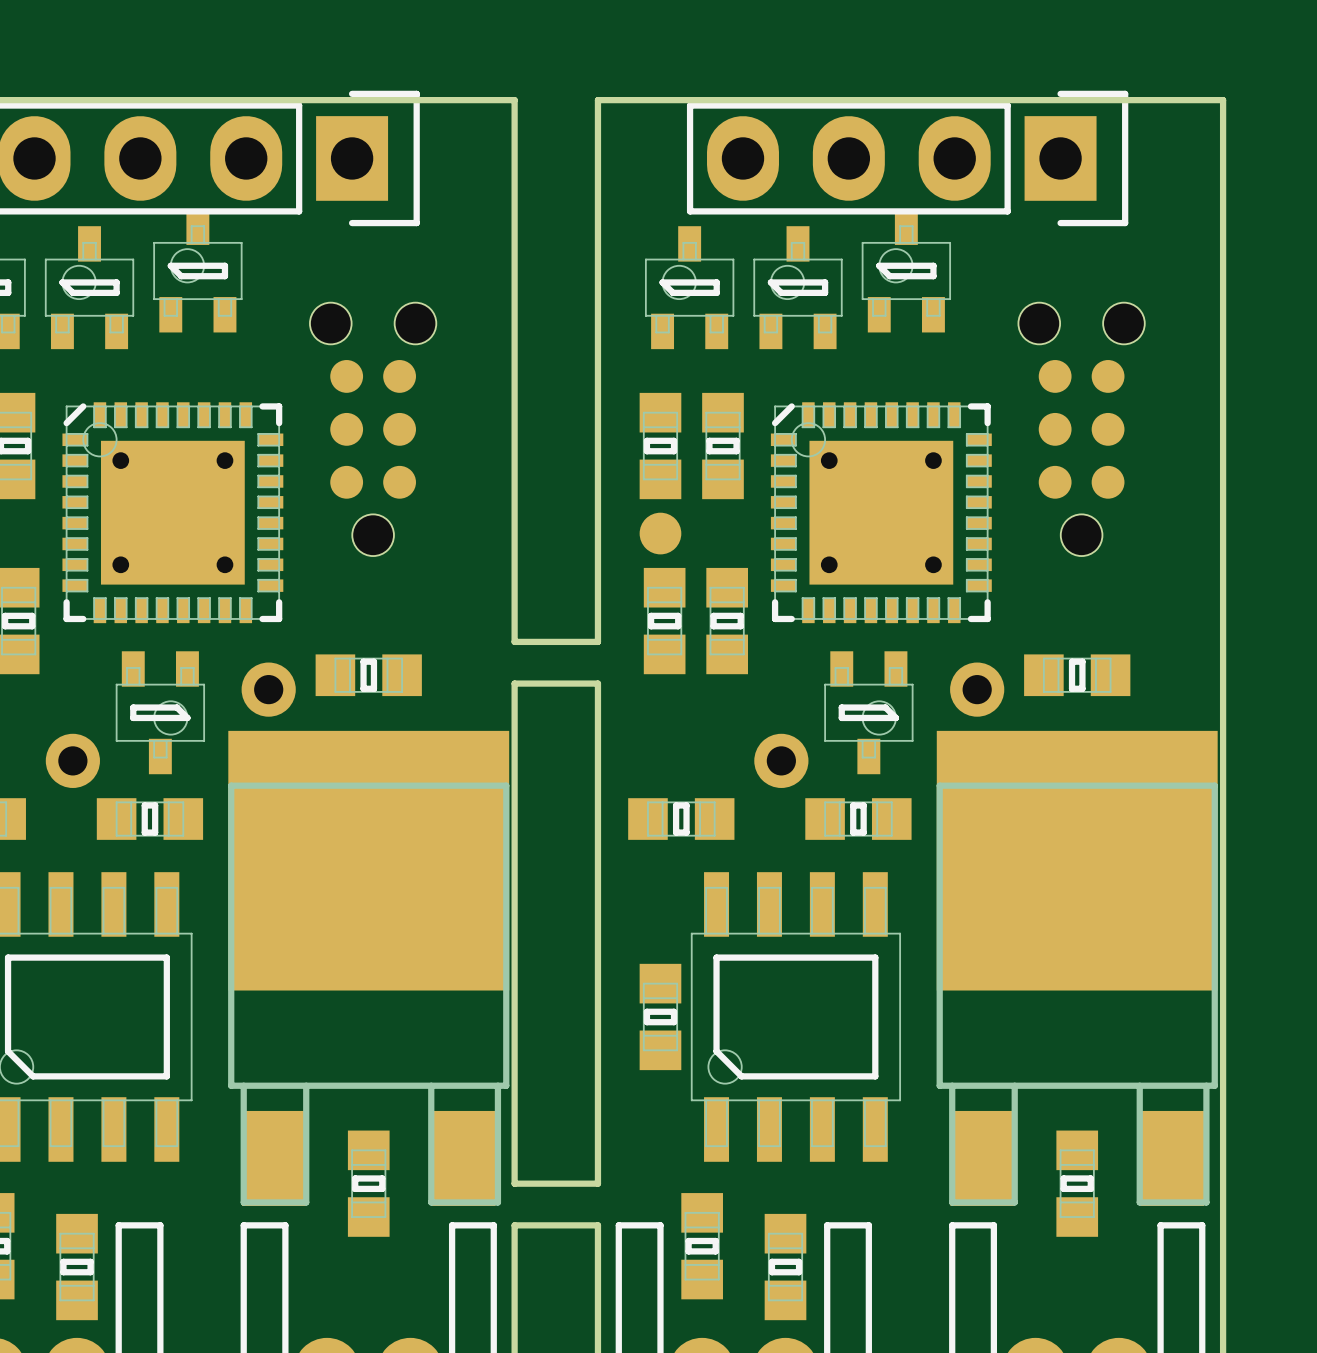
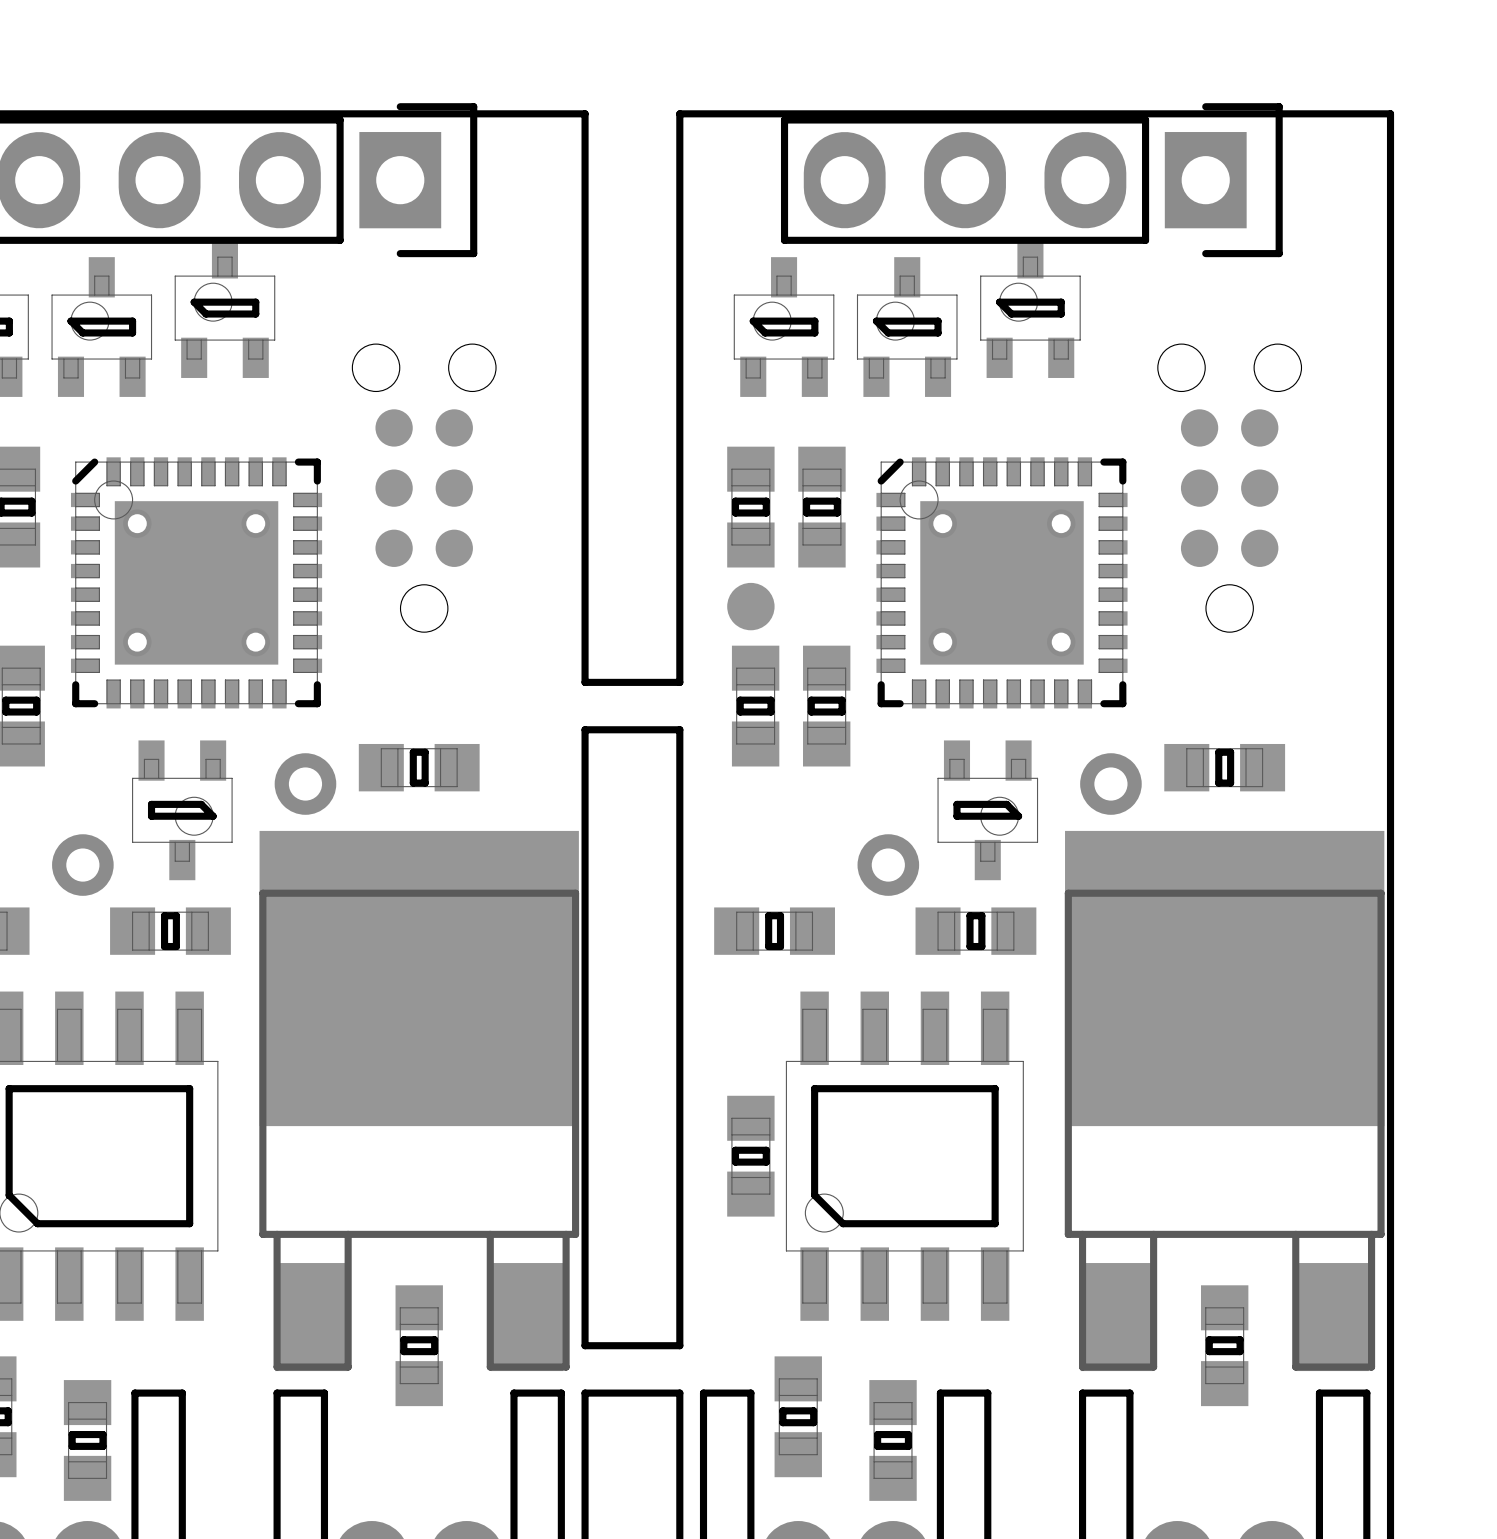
board edge: (514, 600) (514, 641) -> (585, 777) (585, 729)
board edge: (597, 600) (597, 641) -> (679, 777) (679, 729)
board edge: (514, 683) (597, 683) -> (585, 682) (679, 682)

